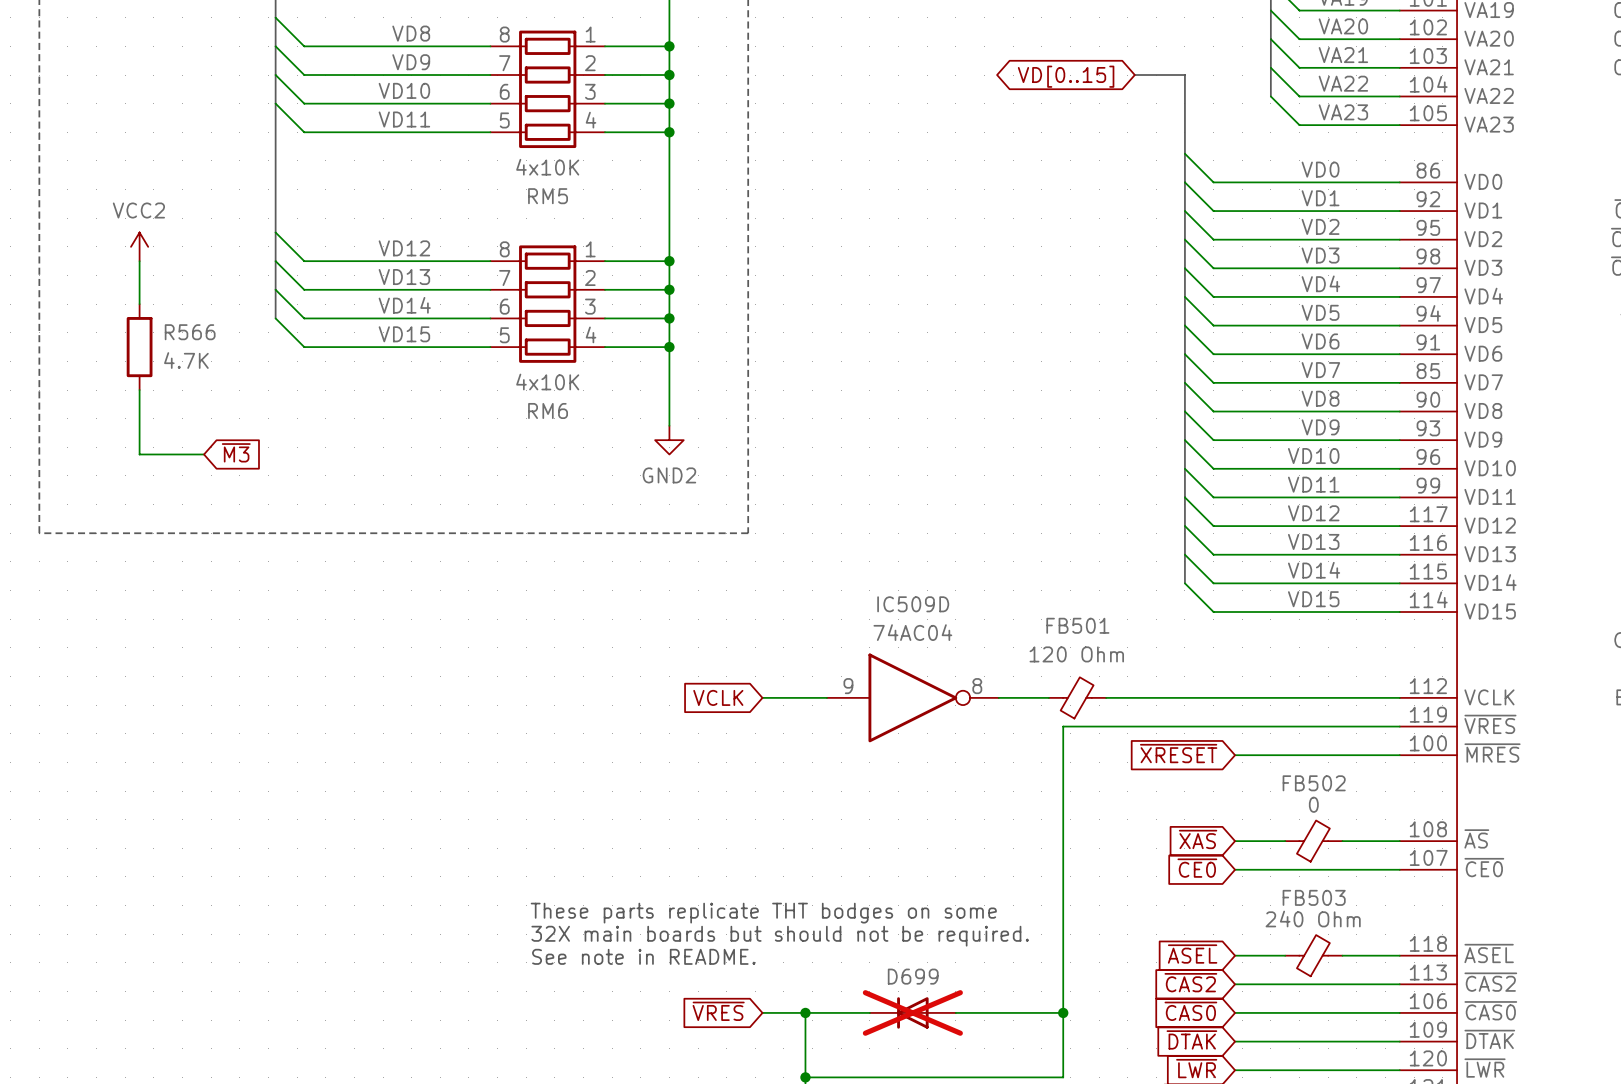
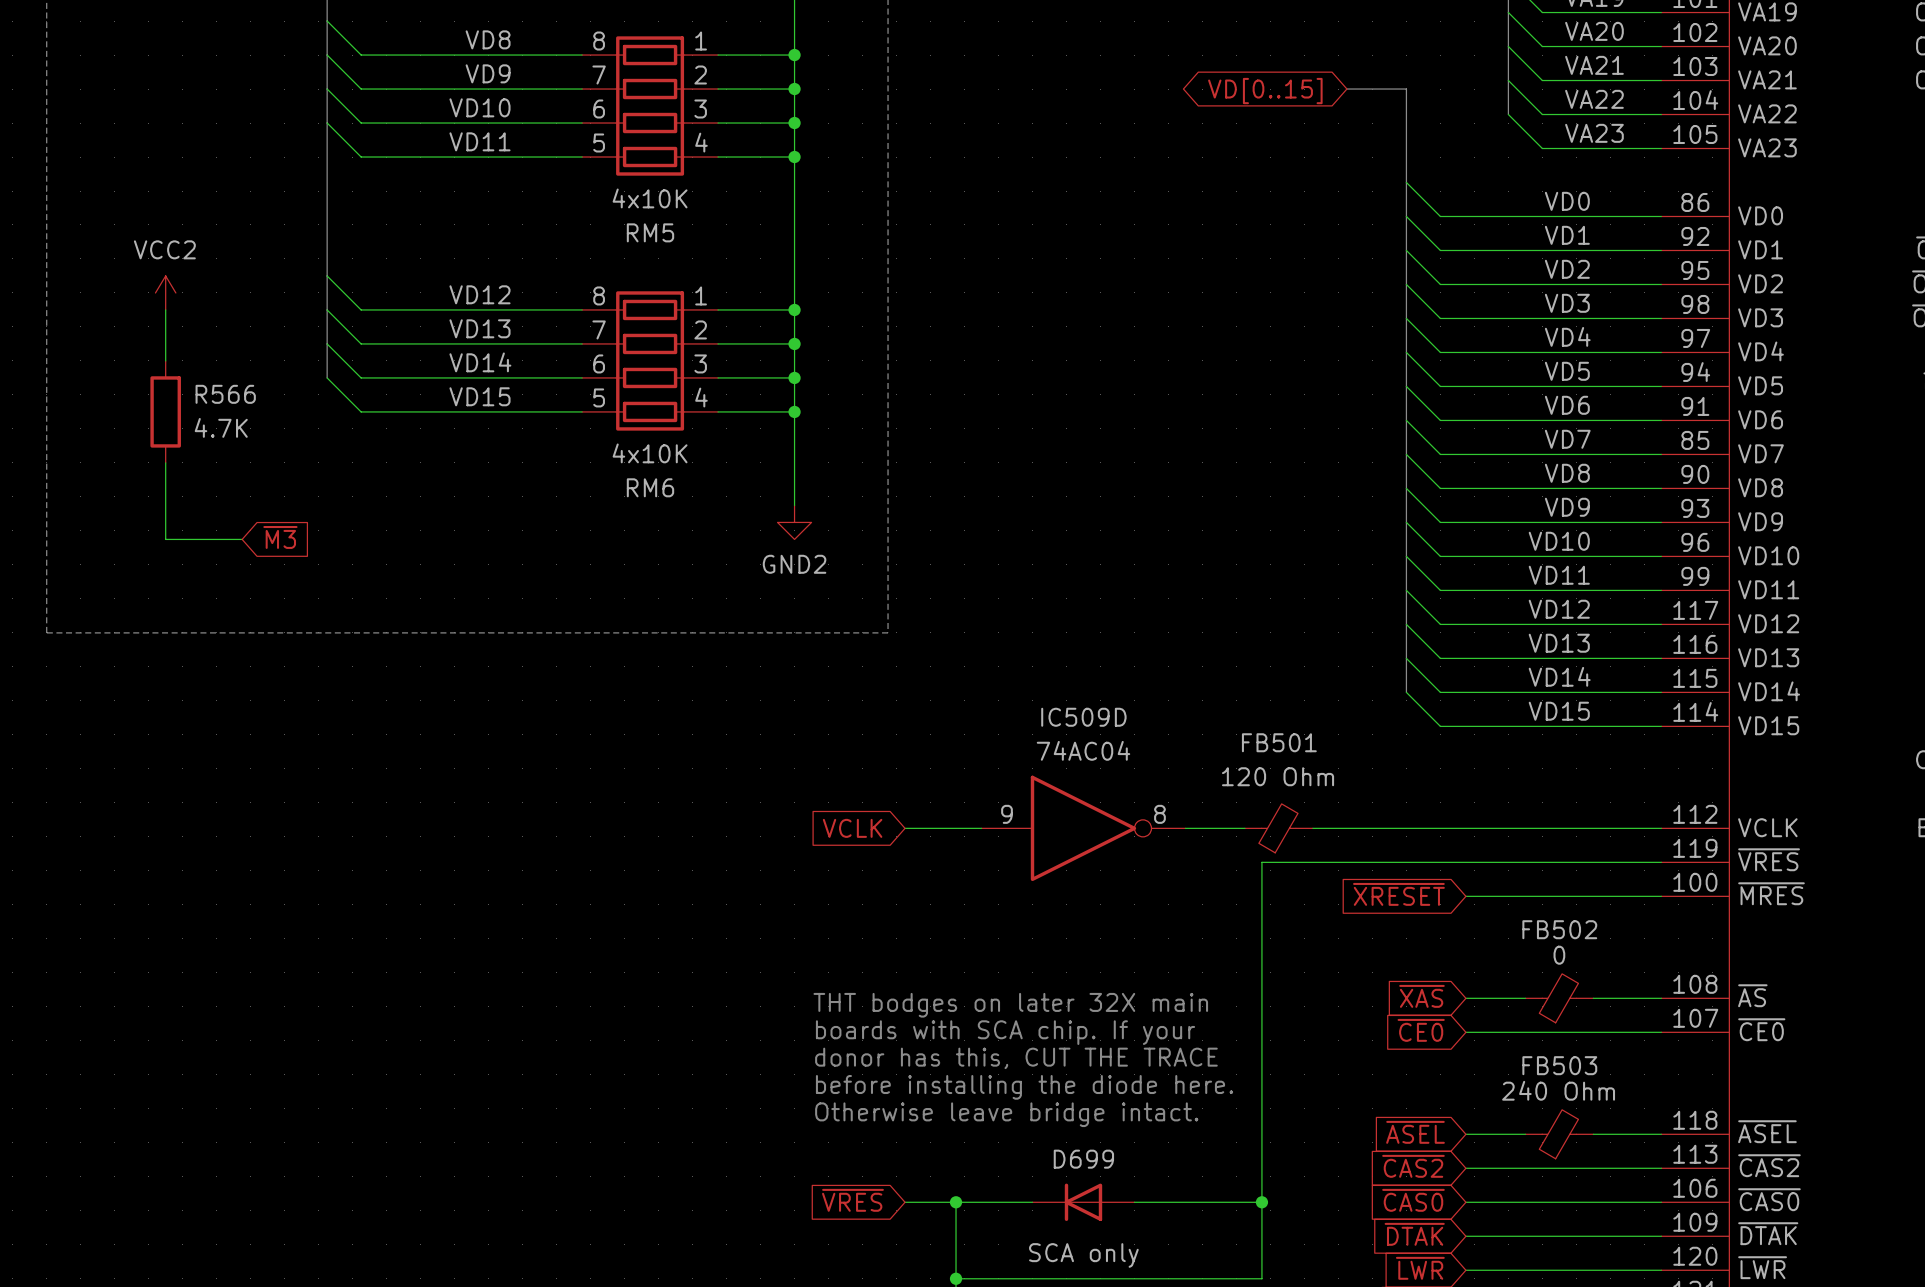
text: none -> THT bodges on later 32X main (1010, 1005)
text: none -> boards with SCA chip. If your (1005, 1032)
text: none -> donor has this, CUT THE TRACE (1016, 1058)
text: These parts replicate THT bodges on some (763, 913) -> none
text: none -> before installing the diode here. (1024, 1087)
text: 32X main boards but should not be required. (780, 936) -> none
text: none -> Otherwise leave bridge intact. (1006, 1114)
text: See note in README. (643, 956) -> none
D699 do-not-place cross: (912, 1012) -> none
D699 value: none -> SCA only (1083, 1255)

